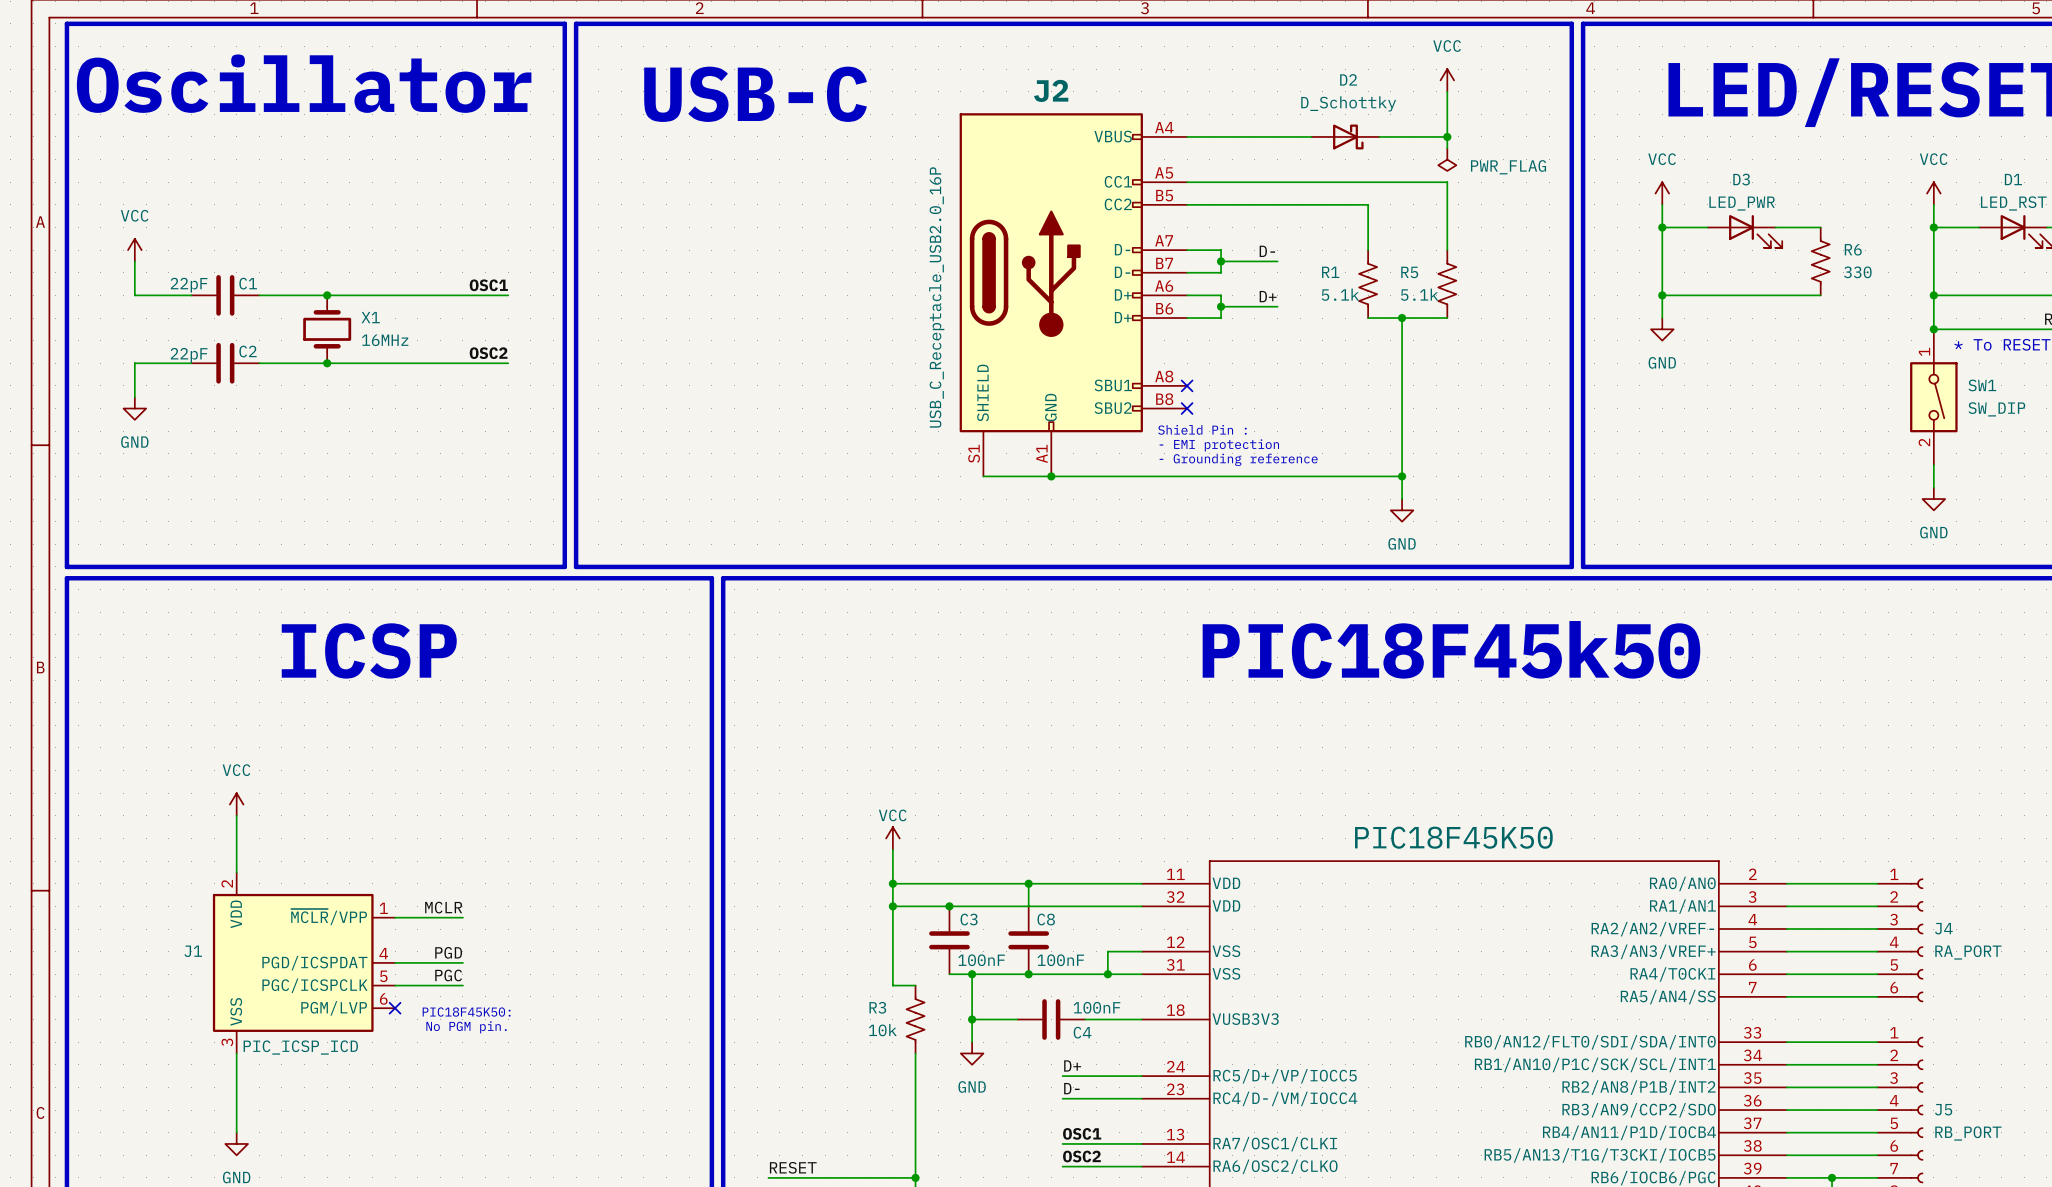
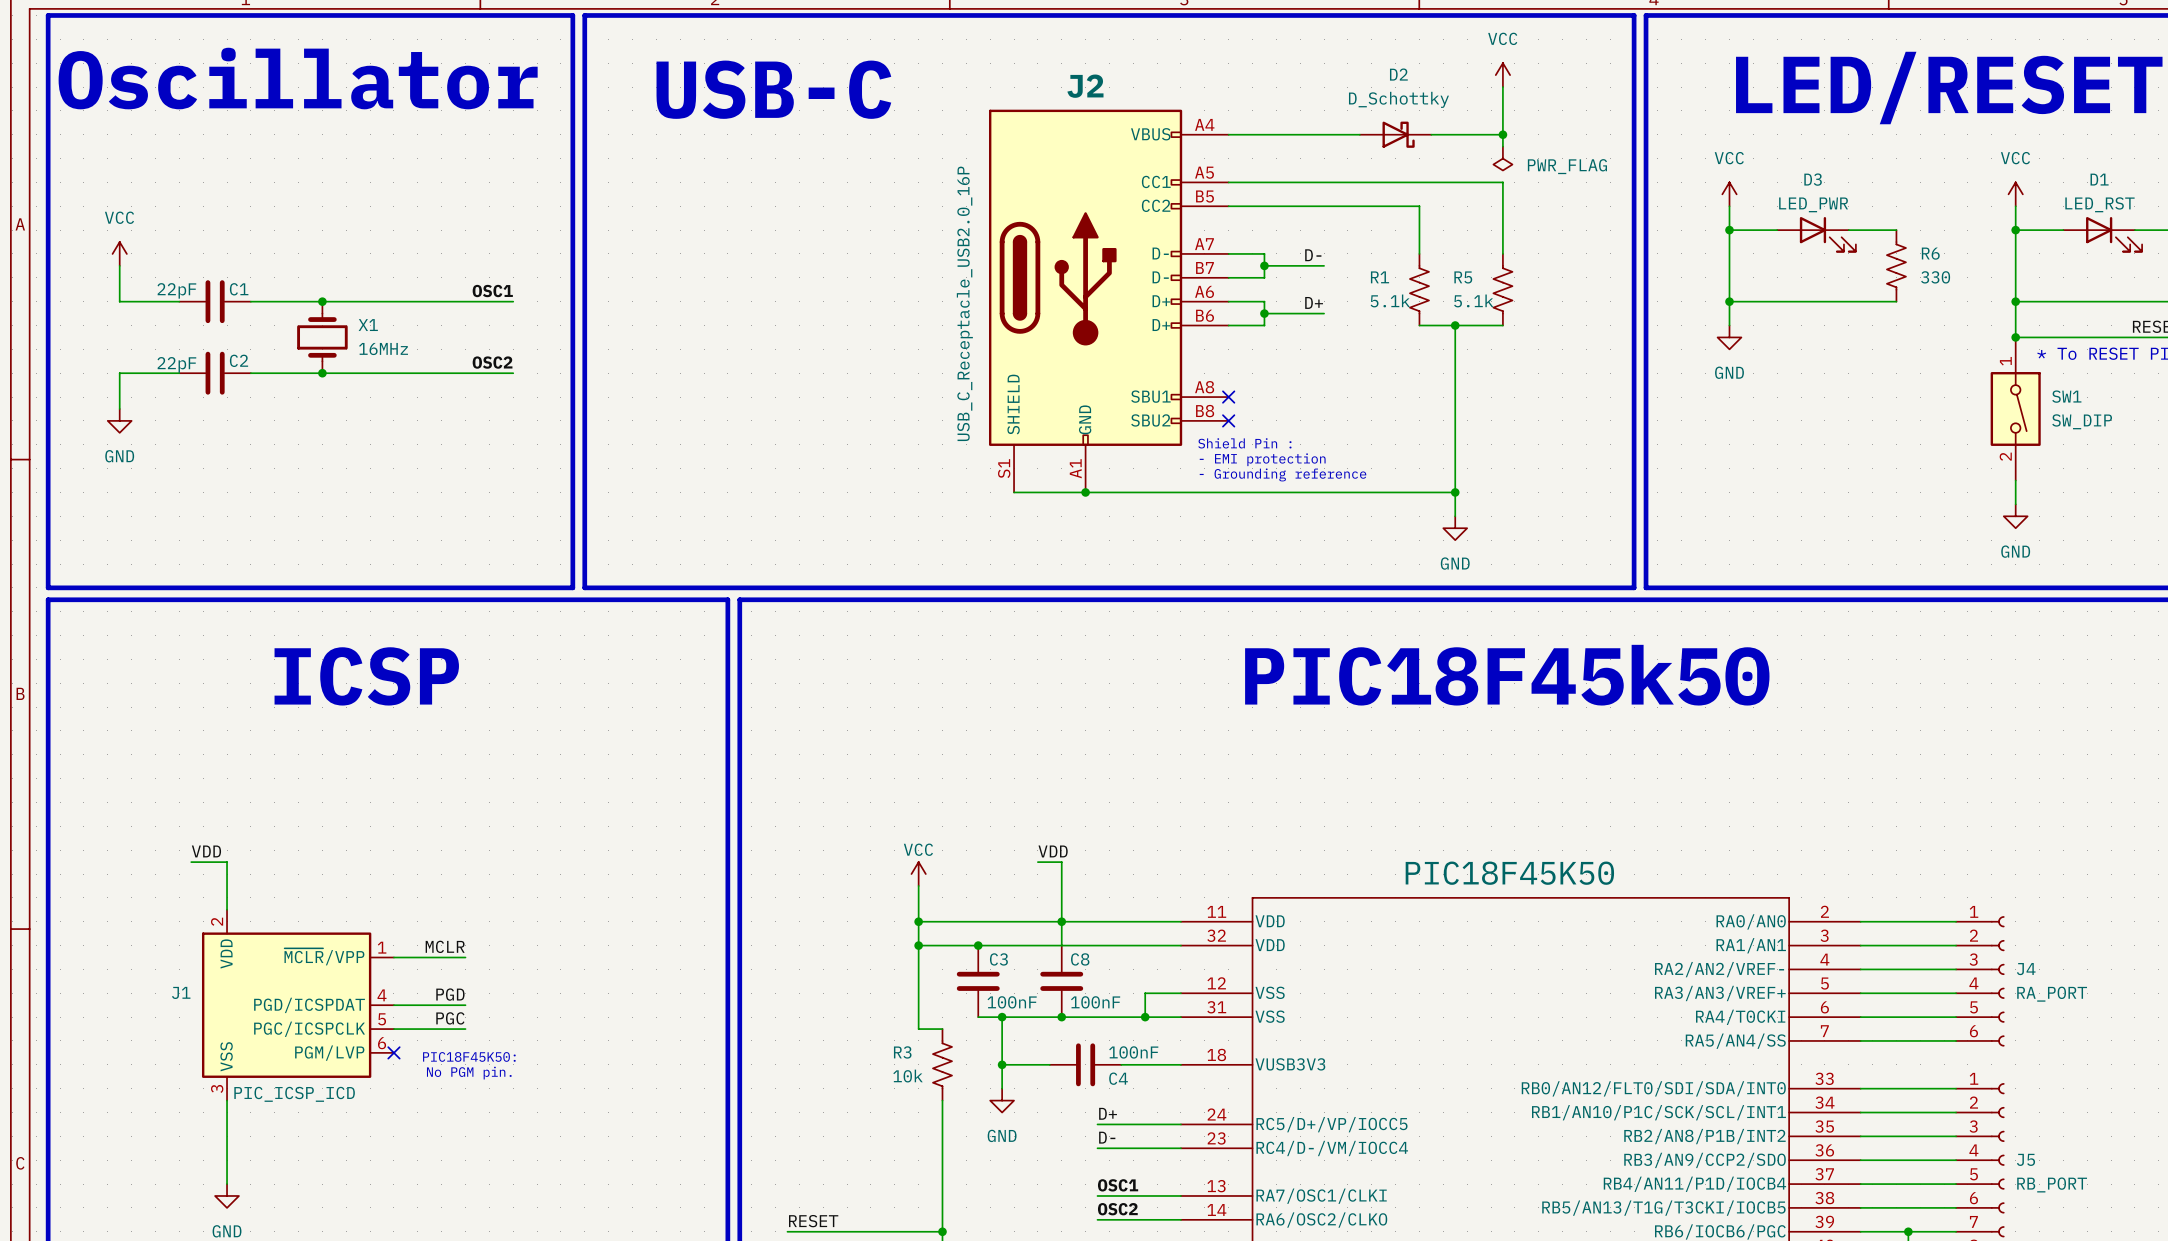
power symbol: VCC (236, 804) -> none
wire: (236, 815) (236, 827) -> (191, 862) (227, 862)
label: none -> VDD (206, 851)
label: none -> VDD (1053, 851)
wire: none -> (1037, 862) (1061, 862) (1061, 921)

